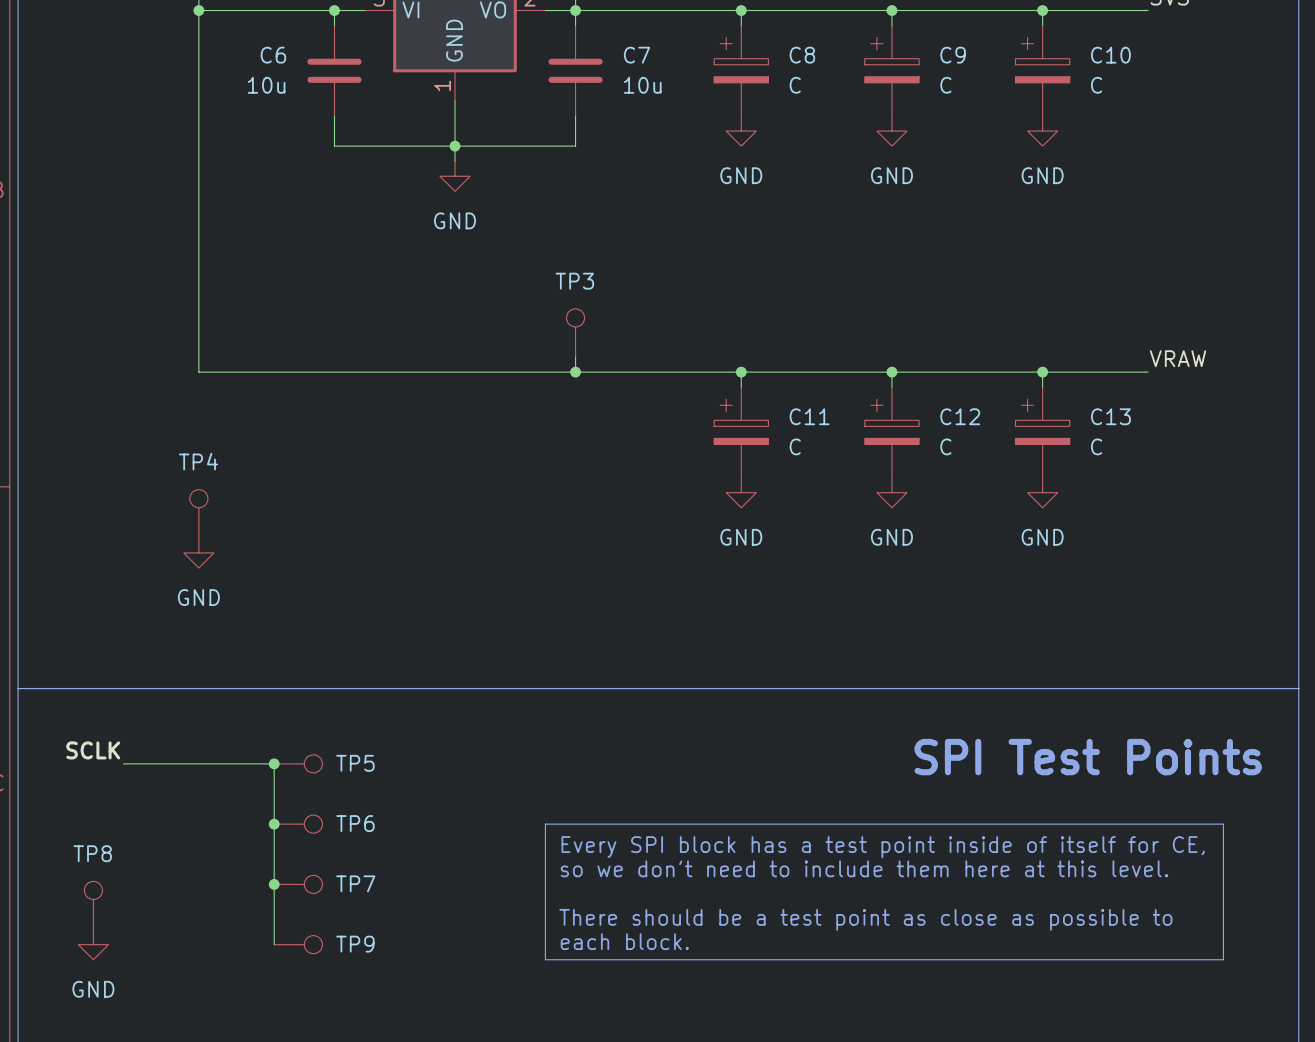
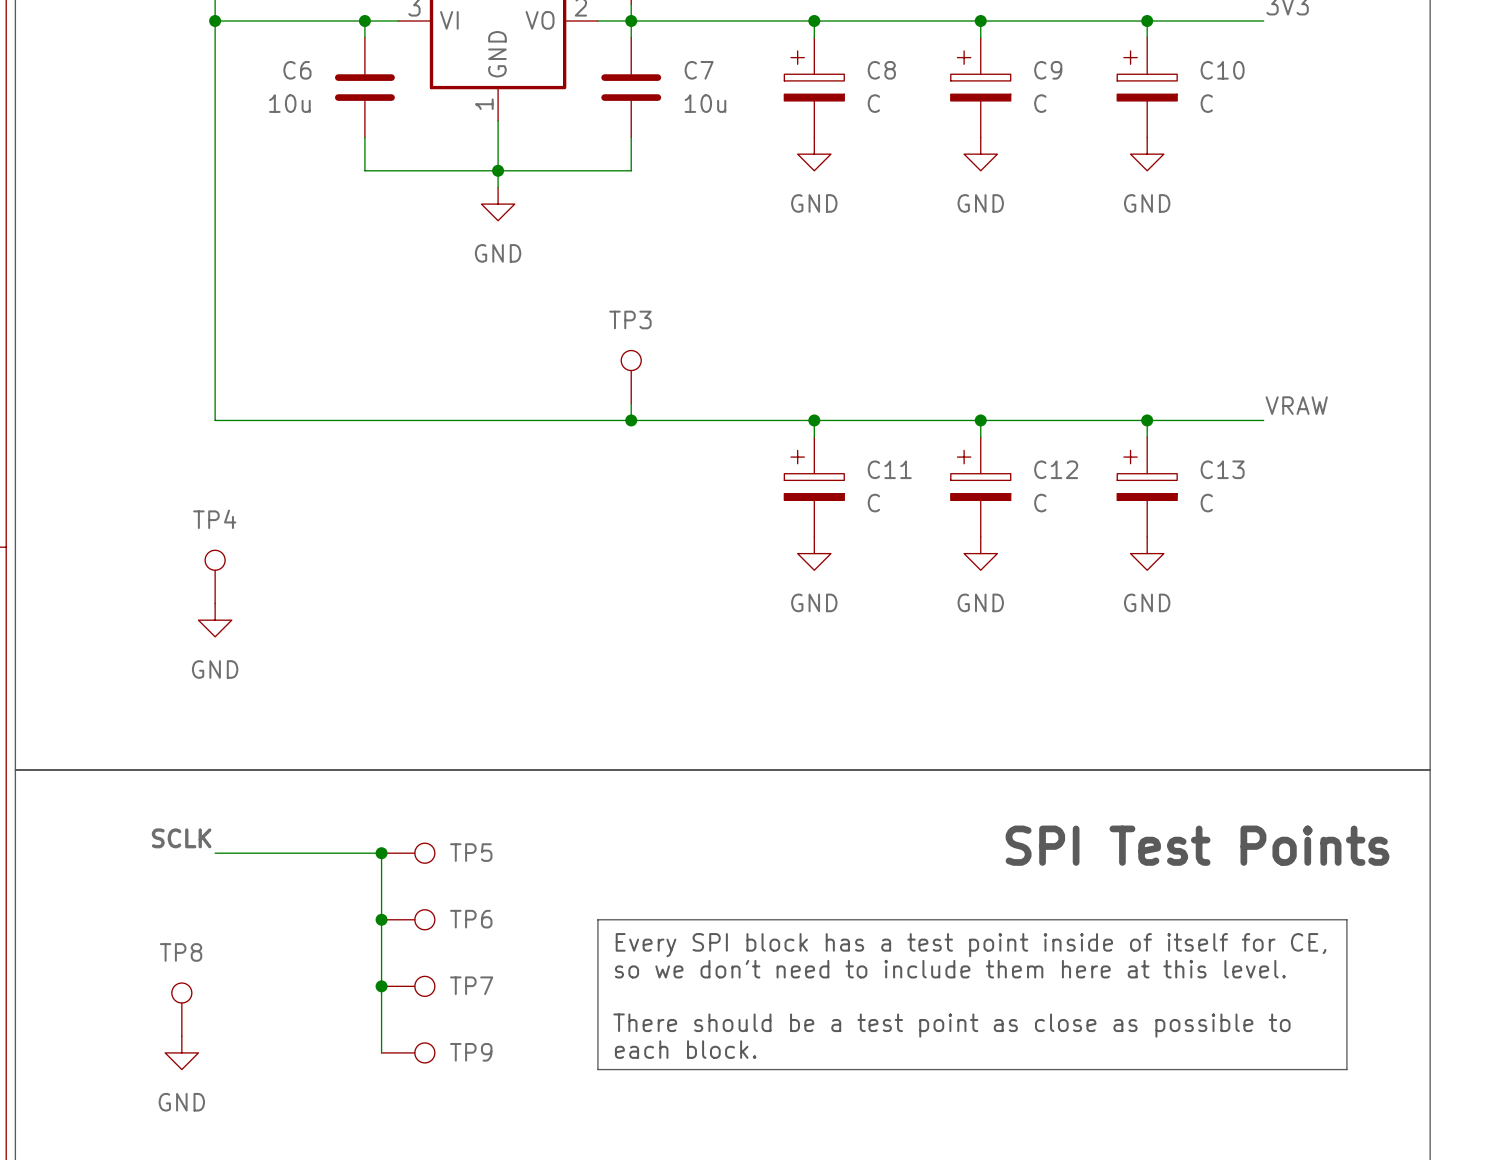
label position: SCLK (93, 750) -> SCLK (181, 838)
wire: (123, 763) (198, 763) -> none
wire: (274, 763) (274, 944) -> (298, 853) (381, 853) (381, 1052)
junction: (274, 763) -> none
TP5 position: (298, 763) -> (408, 853)
junction: none -> (381, 853)
junction: (274, 824) -> none
TP6 position: (298, 824) -> (408, 919)
junction: none -> (381, 919)
junction: (274, 884) -> none
TP7 position: (298, 884) -> (408, 986)
junction: none -> (381, 986)
TP8 position: (93, 905) -> (181, 1009)
power symbol position: GND (93, 944) -> GND (181, 1052)
TP9 position: (298, 944) -> (408, 1052)

